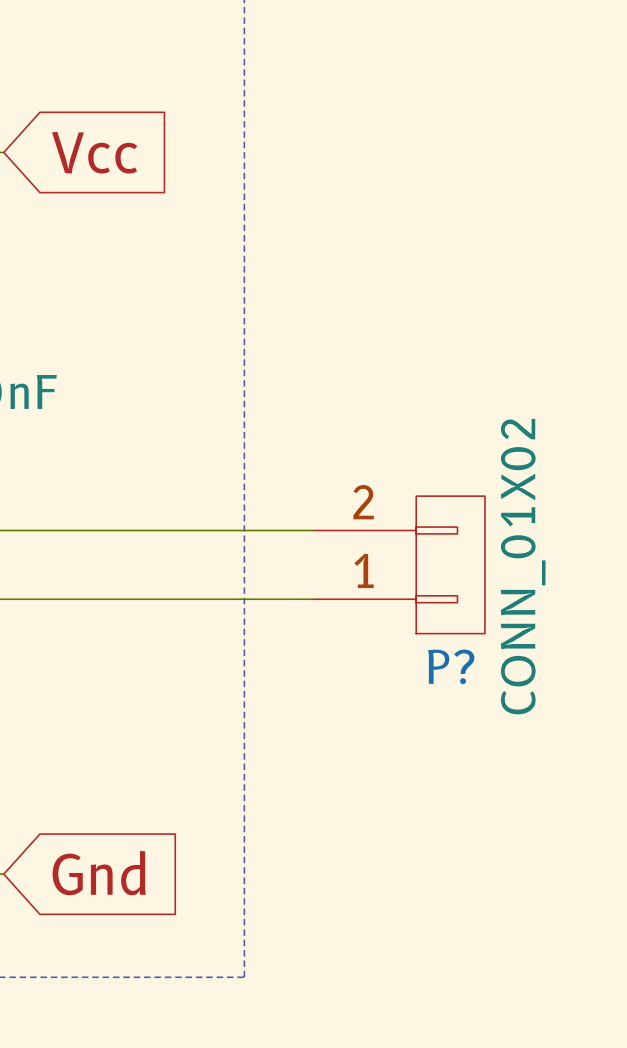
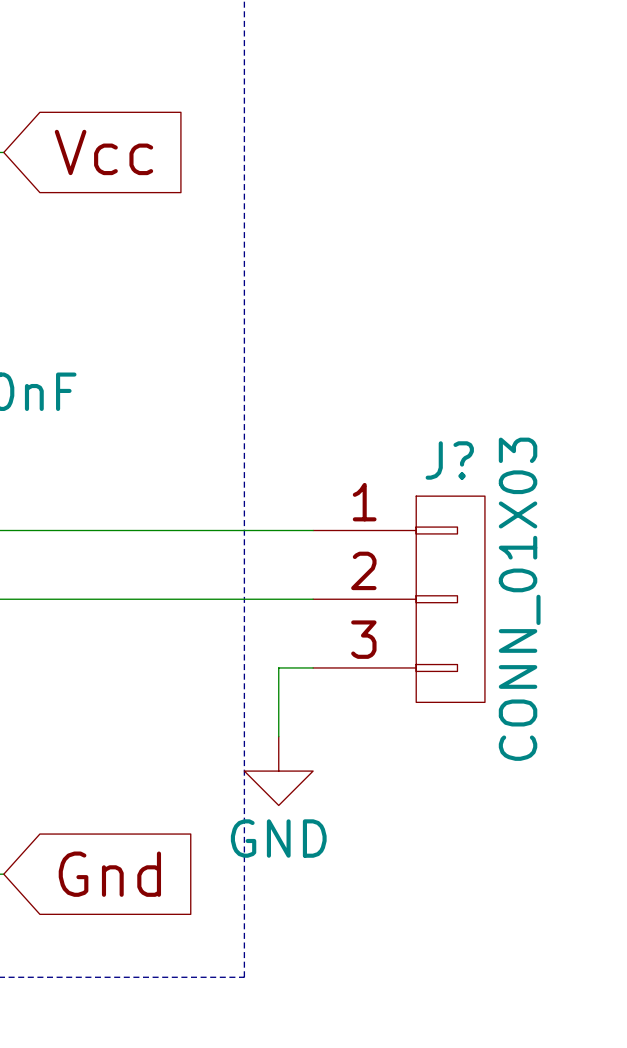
P?: CONN_01X02 (399, 564) -> none
J?: none -> CONN_01X03 (399, 599)
wire: none -> (313, 667) (278, 667) (278, 736)
power symbol: none -> GND (278, 771)

